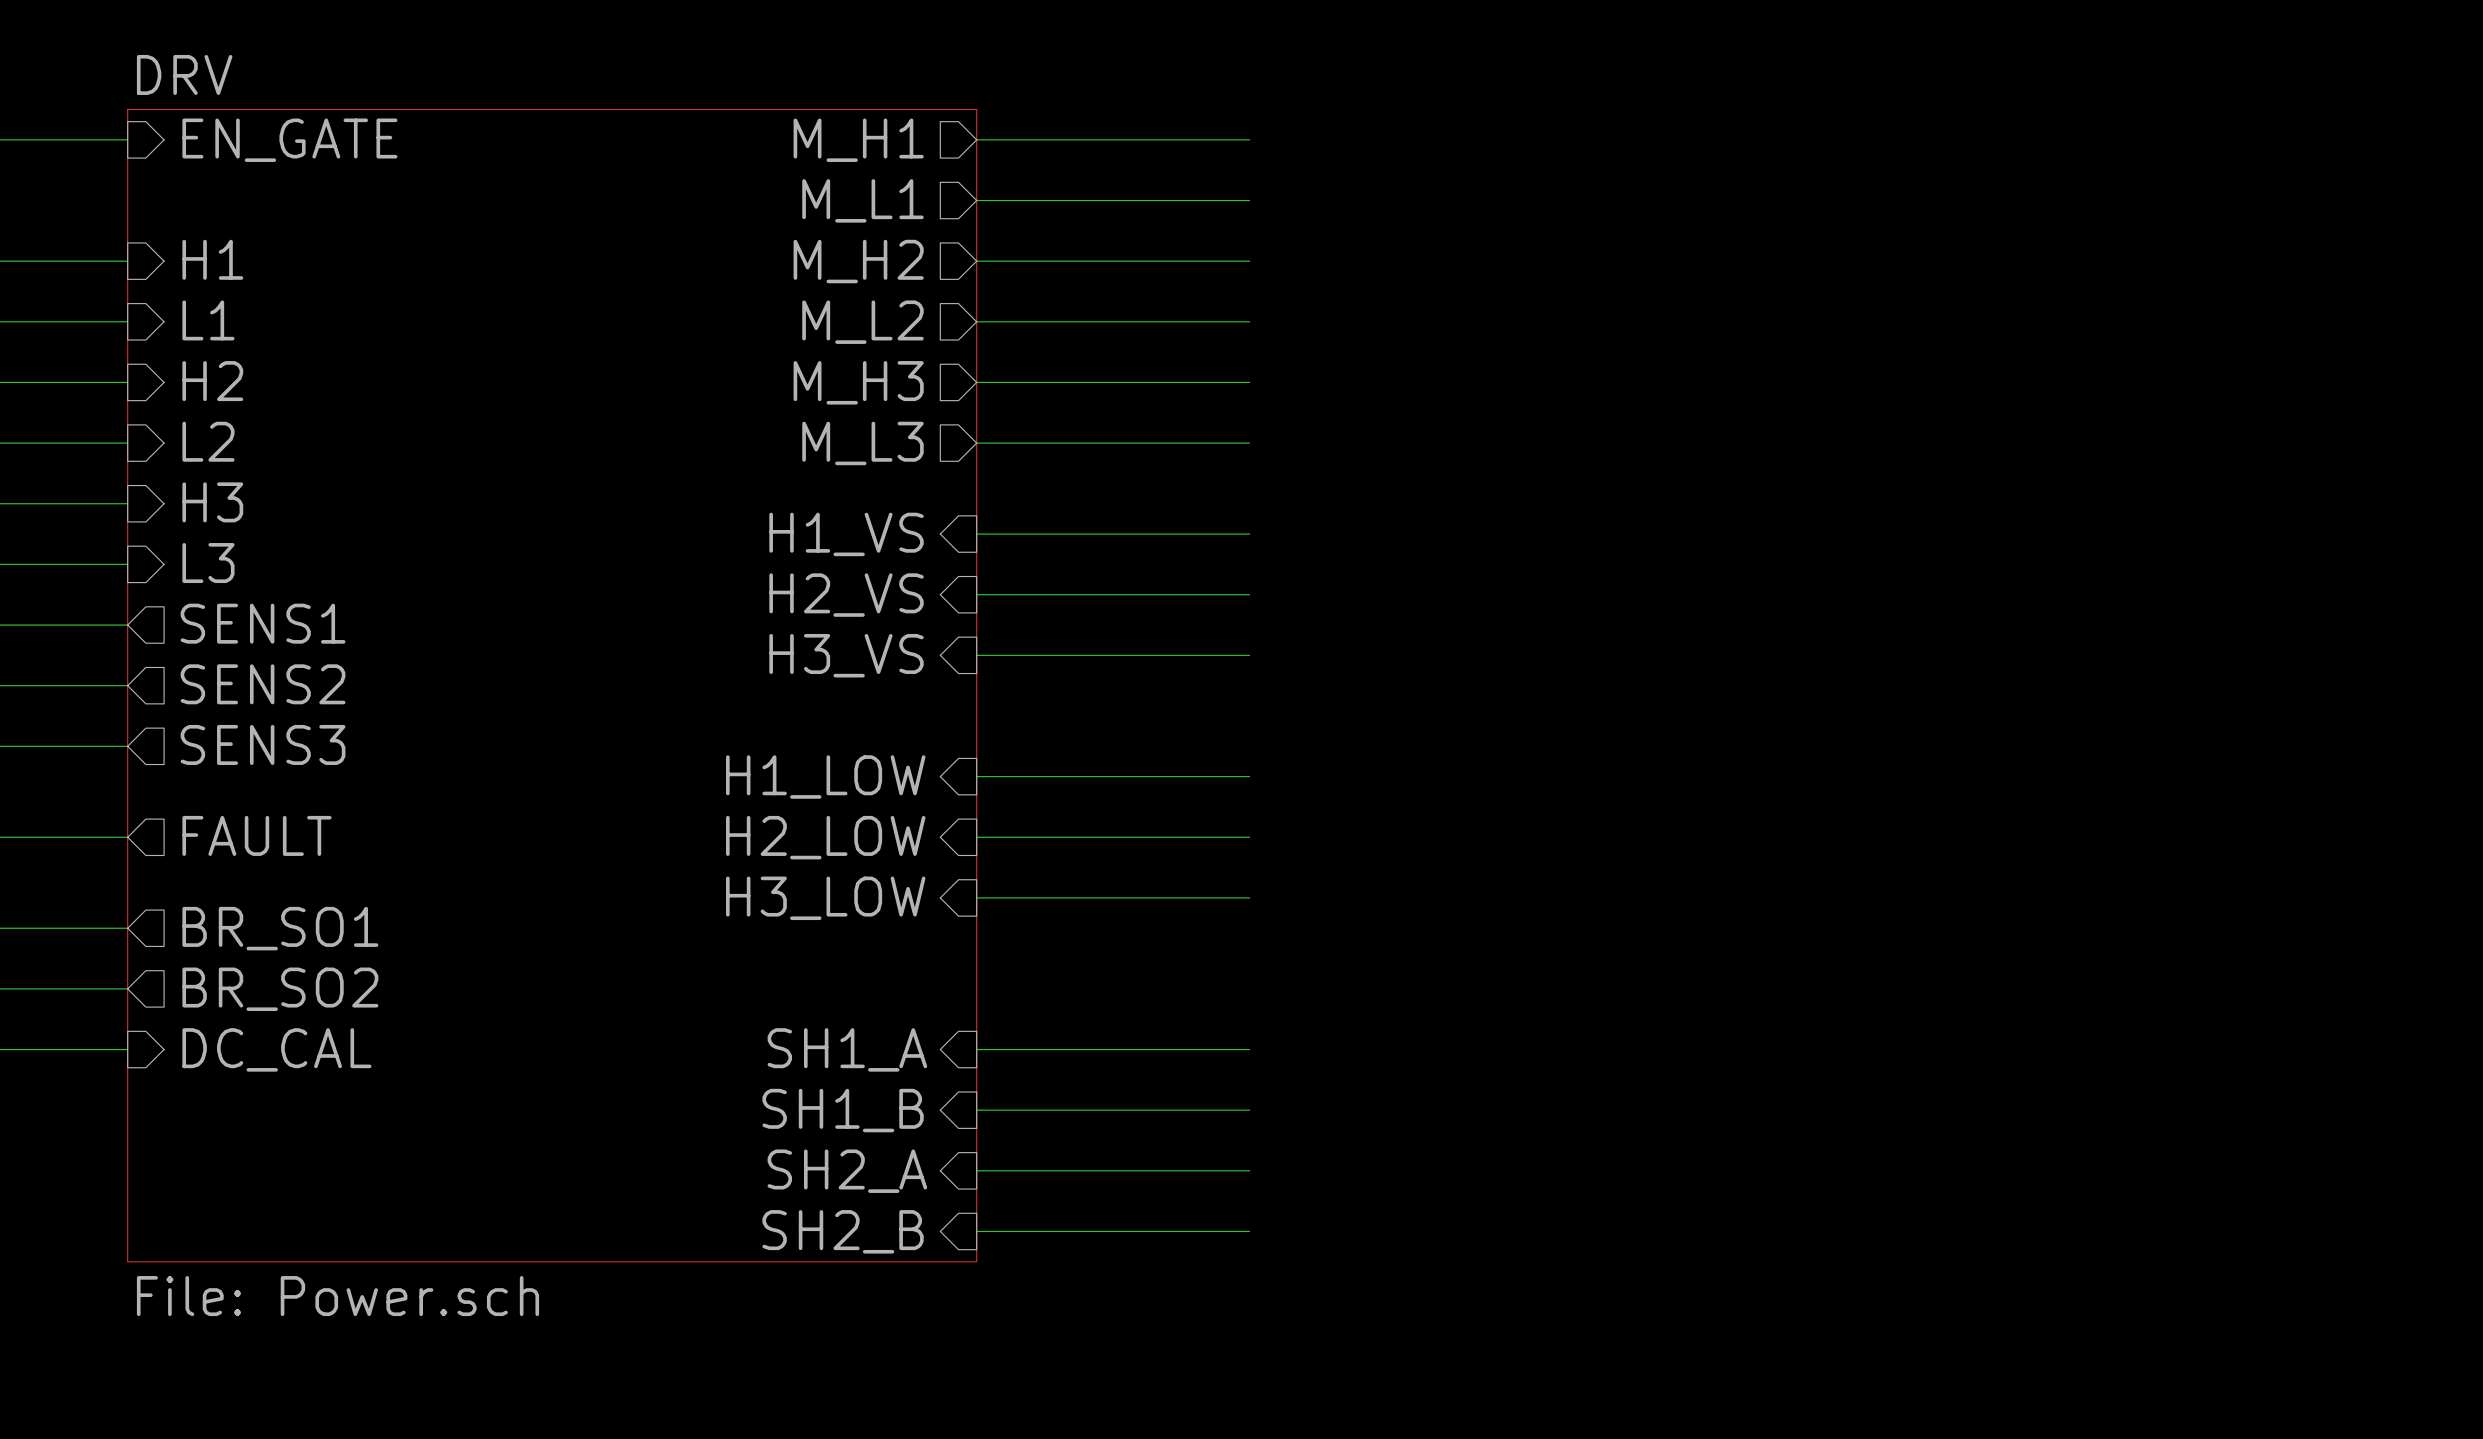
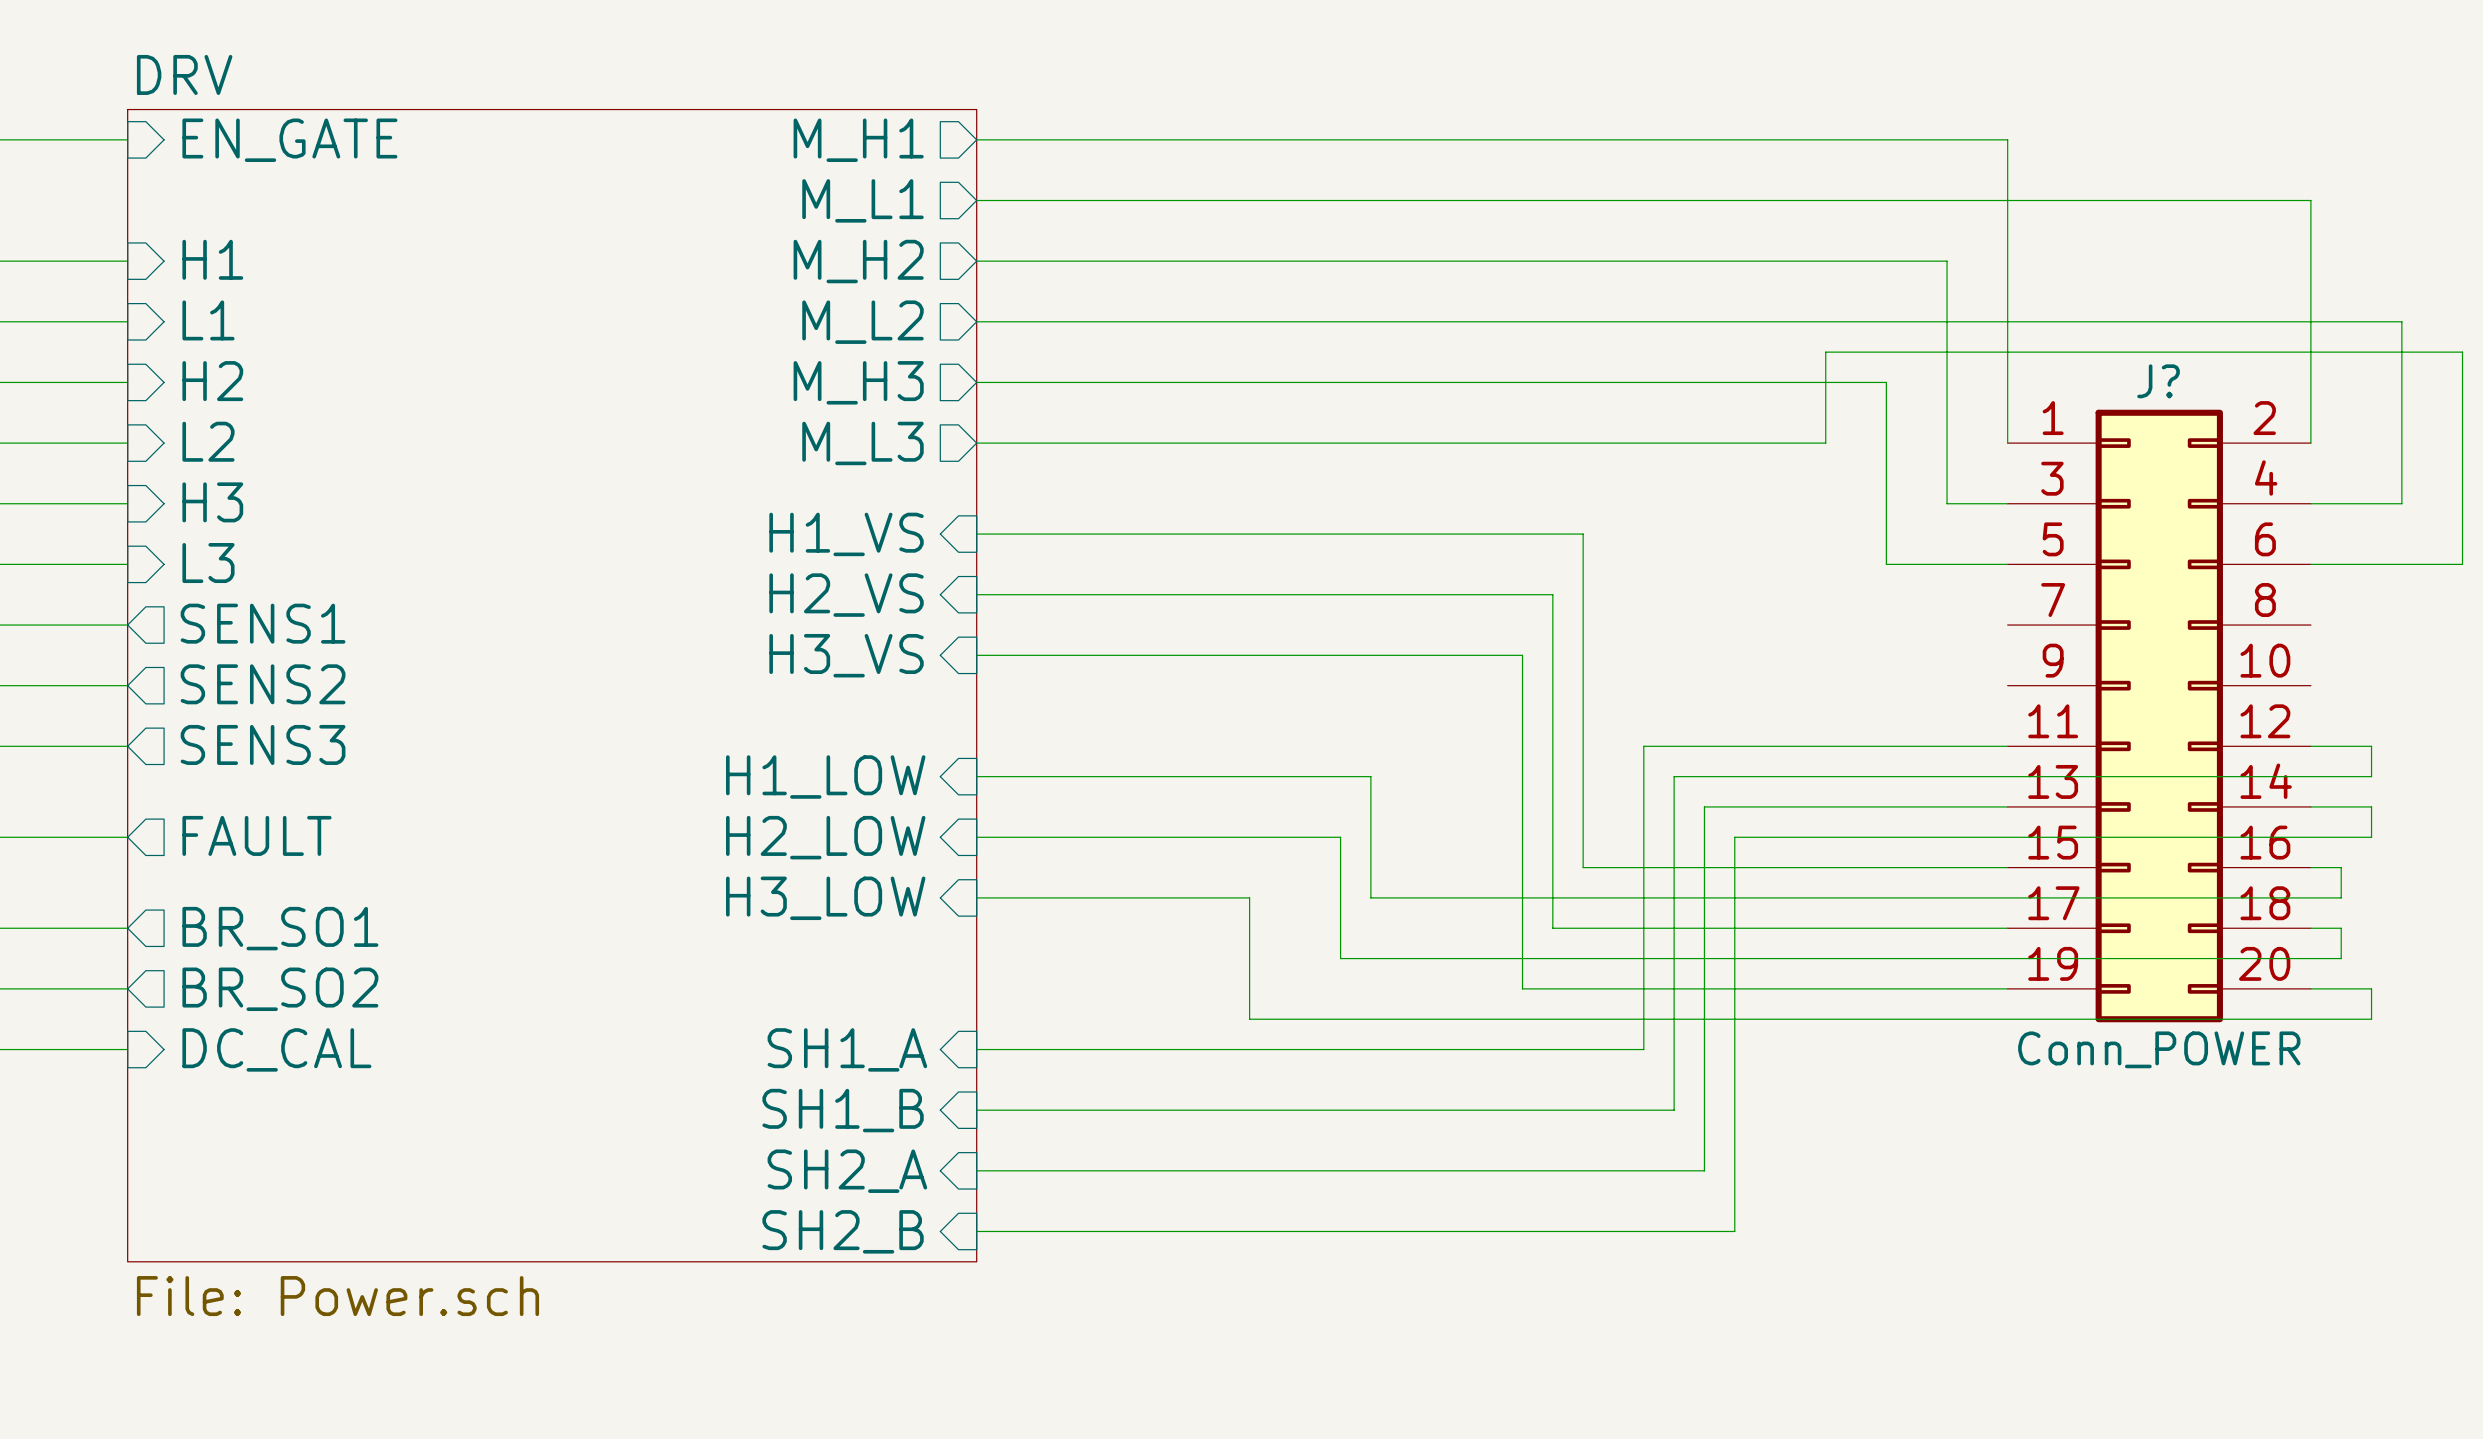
wire: none -> (1249, 139) (2007, 139) (2007, 443)
wire: none -> (1249, 200) (2310, 200) (2310, 443)
wire: none -> (1249, 261) (1947, 261) (1947, 503) (2007, 503)
wire: none -> (1249, 321) (2401, 321) (2401, 503) (2310, 503)
wire: none -> (1249, 382) (1886, 382) (1886, 564) (2007, 564)
wire: none -> (1249, 443) (1825, 443) (1825, 352) (2462, 352) (2462, 564) (2310, 564)
wire: none -> (1249, 534) (1583, 534) (1583, 867) (2007, 867)
wire: none -> (1249, 594) (1552, 594) (1552, 928) (2007, 928)
wire: none -> (1249, 655) (1522, 655) (1522, 988) (2007, 988)
J?: none -> Conn_POWER (2159, 715)
wire: none -> (2007, 746) (1643, 746) (1643, 1049) (1249, 1049)
wire: none -> (2310, 746) (2371, 746) (2371, 776) (1674, 776) (1674, 1110) (1249, 1110)
wire: none -> (1249, 776) (1370, 776) (1370, 897) (2341, 897) (2341, 867) (2310, 867)
wire: none -> (2007, 806) (1704, 806) (1704, 1170) (1249, 1170)
wire: none -> (2310, 806) (2371, 806) (2371, 837) (1734, 837) (1734, 1231) (1249, 1231)
wire: none -> (1249, 837) (1340, 837) (1340, 958) (2341, 958) (2341, 928) (2310, 928)
wire: none -> (1249, 897) (1249, 1019) (2371, 1019) (2371, 988) (2310, 988)

